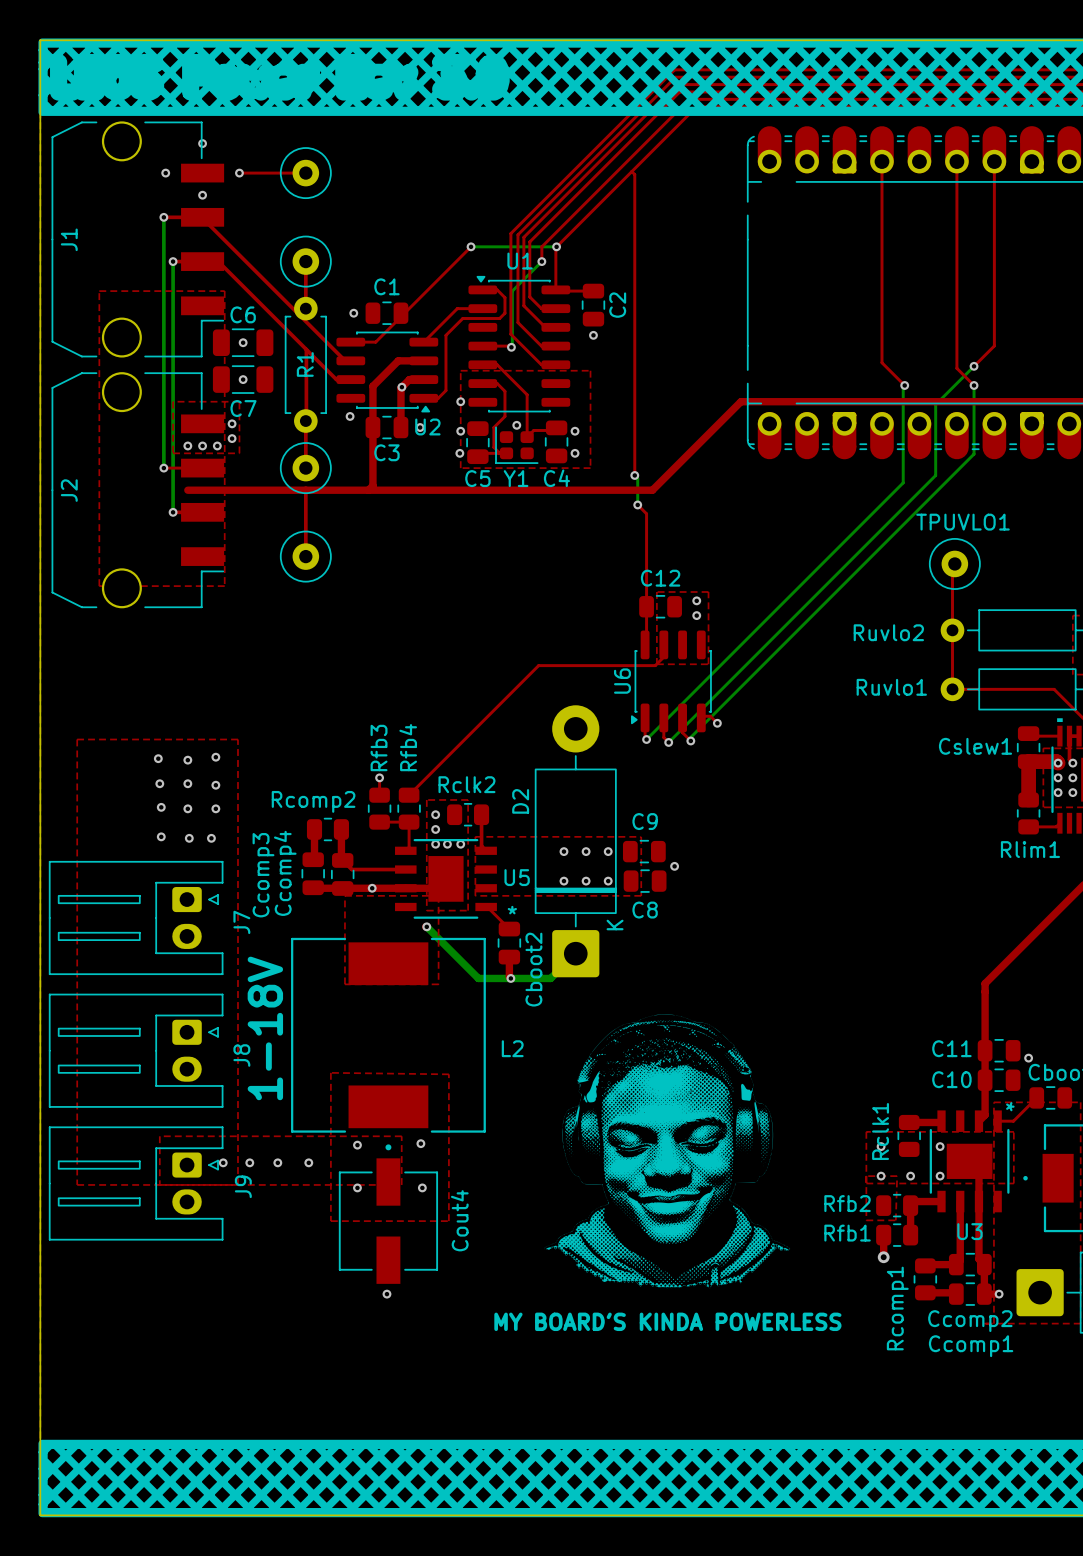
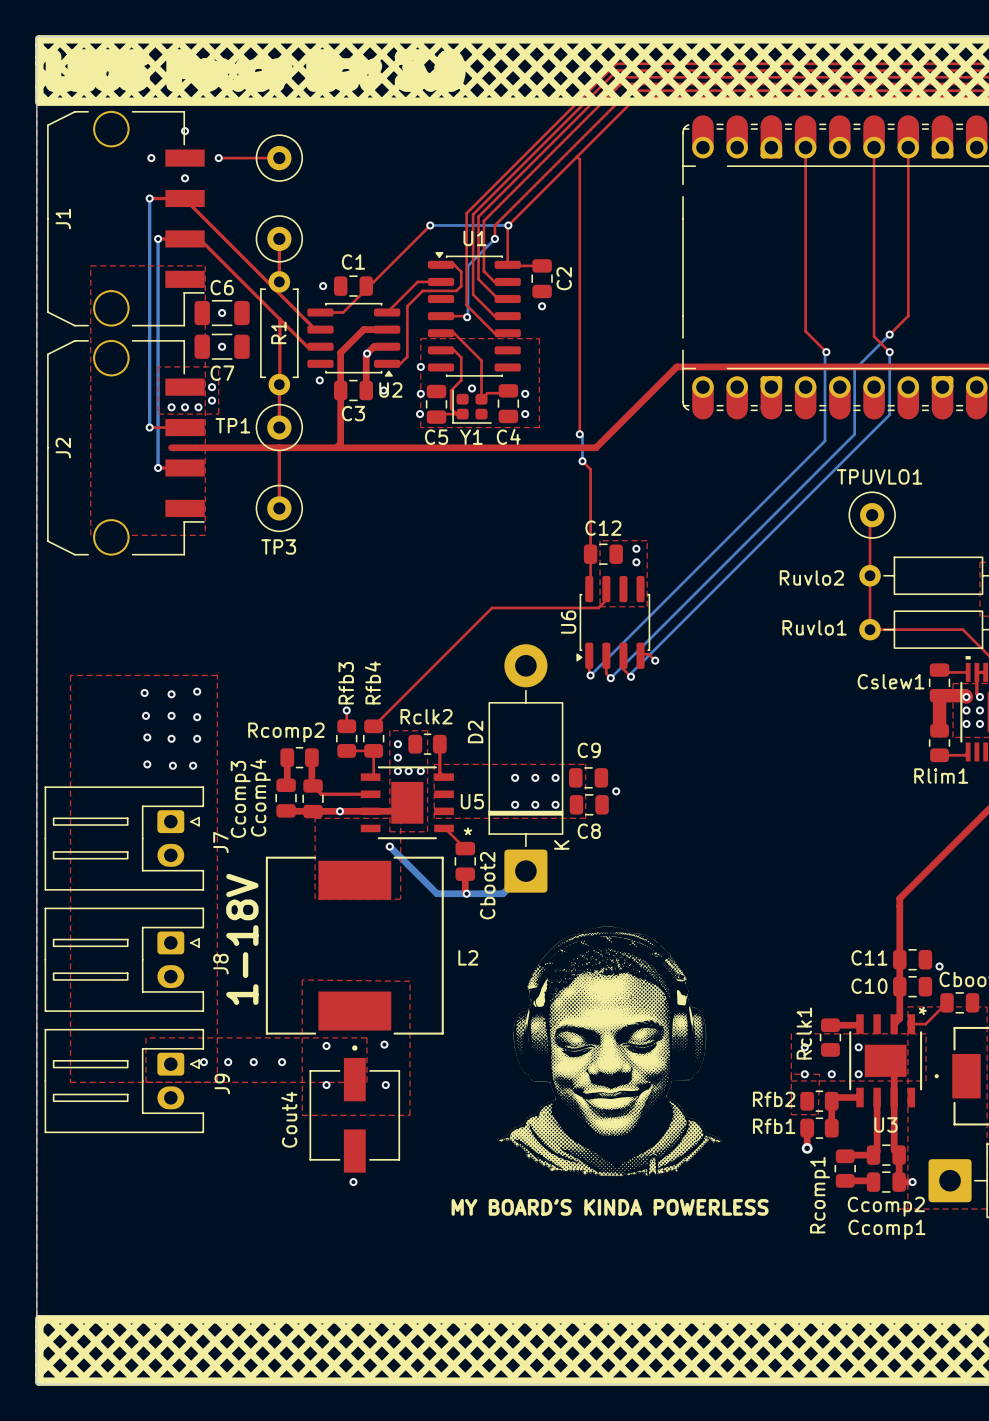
TP1 name: none -> TP1 (232, 425)
TP3 name: none -> TP3 (278, 546)
Cout4 name position: Cout4 (459, 1220) -> Cout4 (289, 1119)

